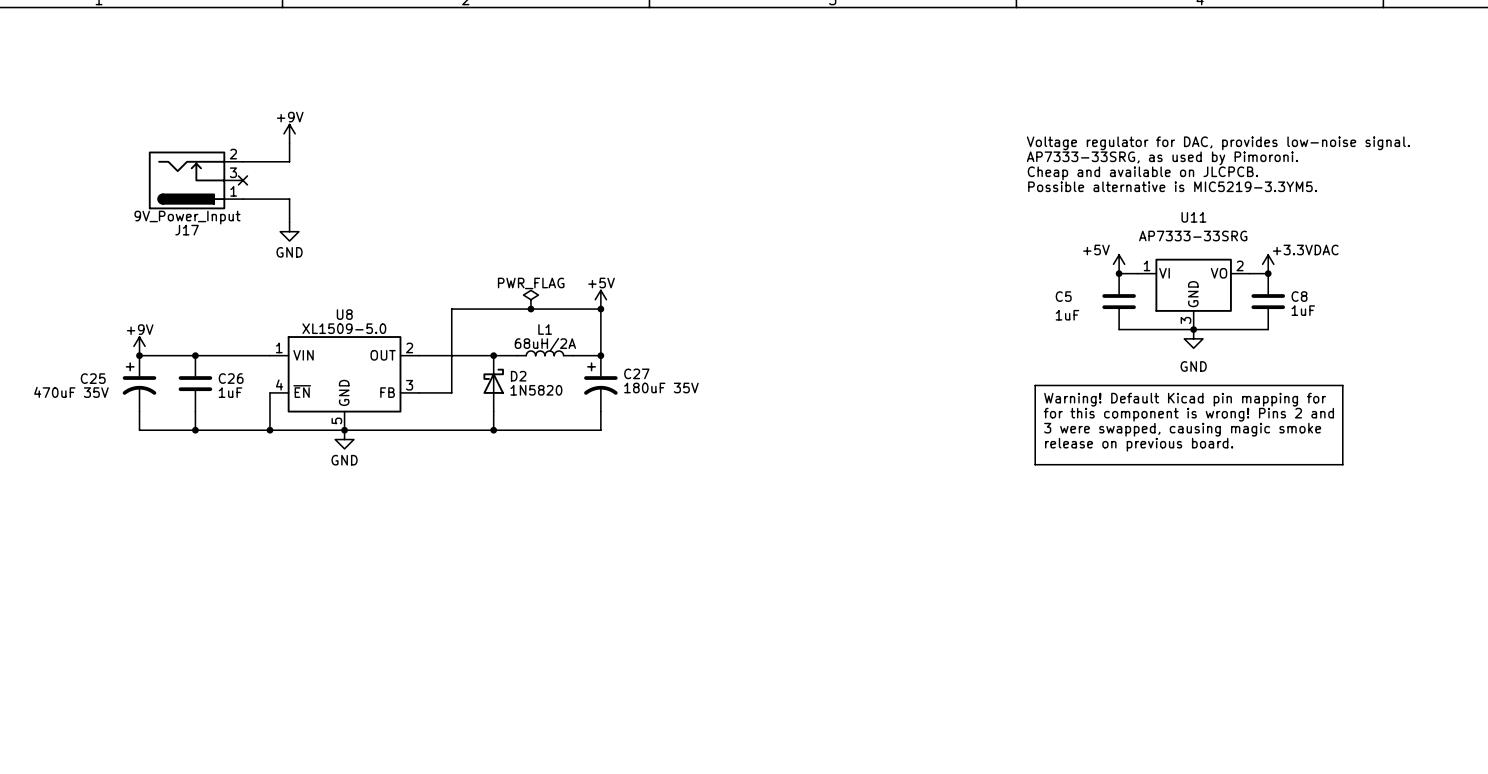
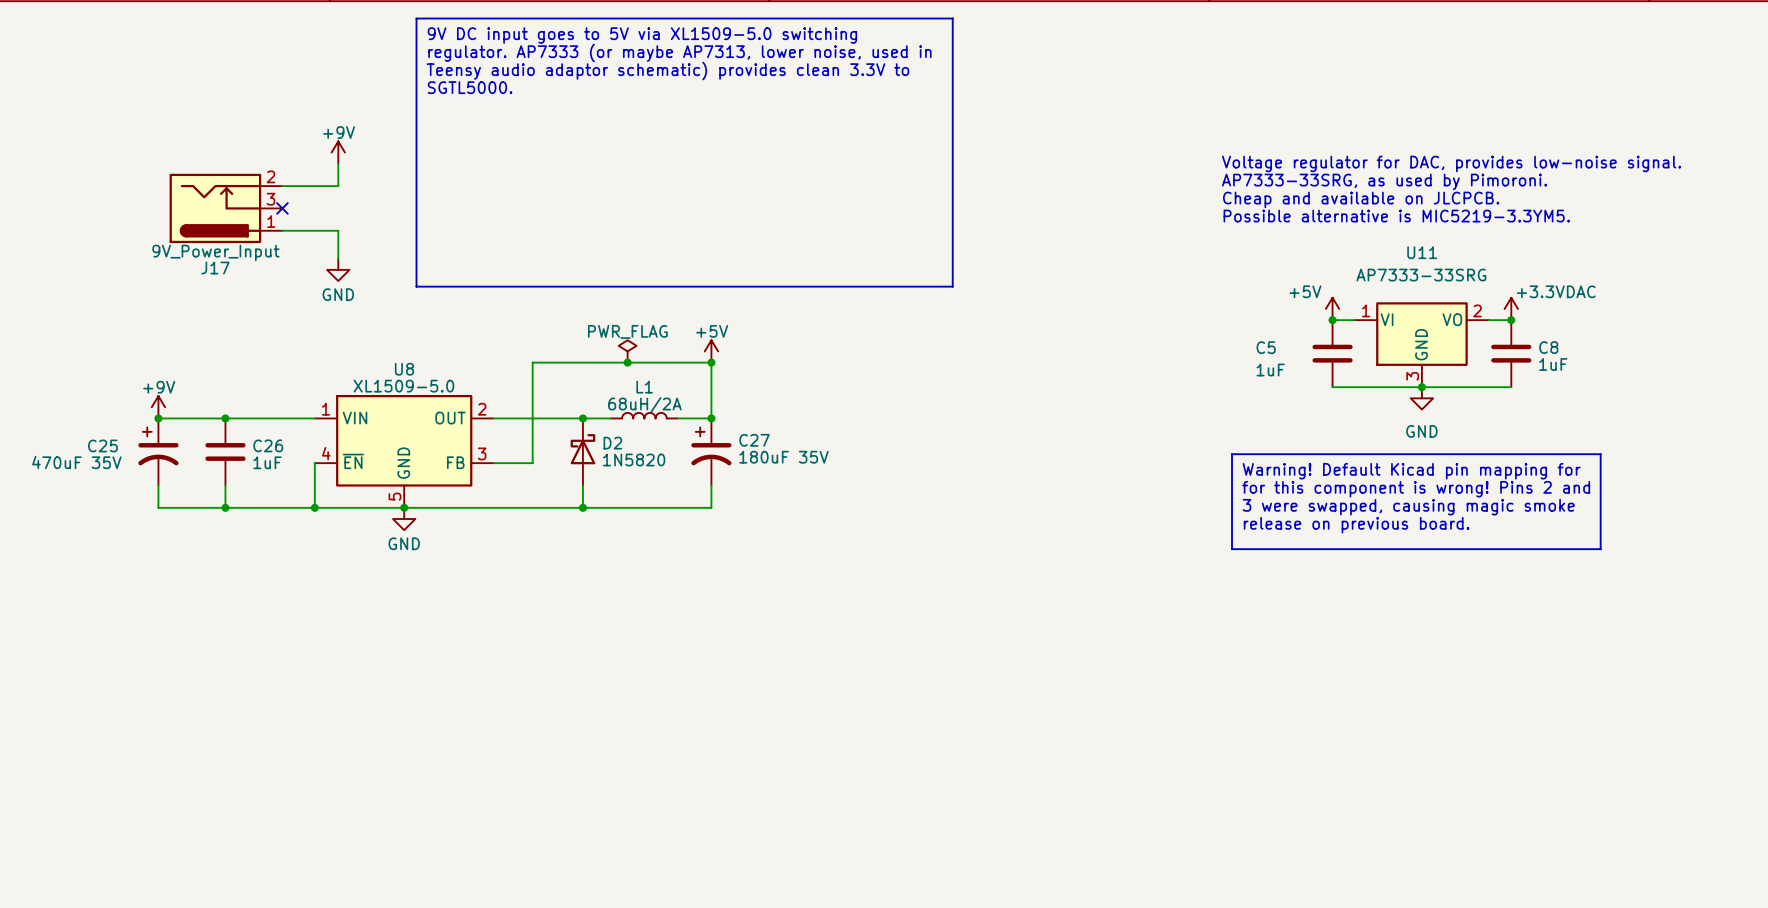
line: none -> (416, 18) (952, 18) (952, 286) (416, 286) (416, 18)
text: none -> 9V DC input goes to 5V via XL1509-5.0 switching (642, 35)
text: none -> regulator. AP7333 (or maybe AP7313, lower noise, used in (679, 53)
text: none -> Teensy audio adaptor schematic) provides clean 3.3V to (667, 70)
text: none -> SGTL5000. (470, 87)

